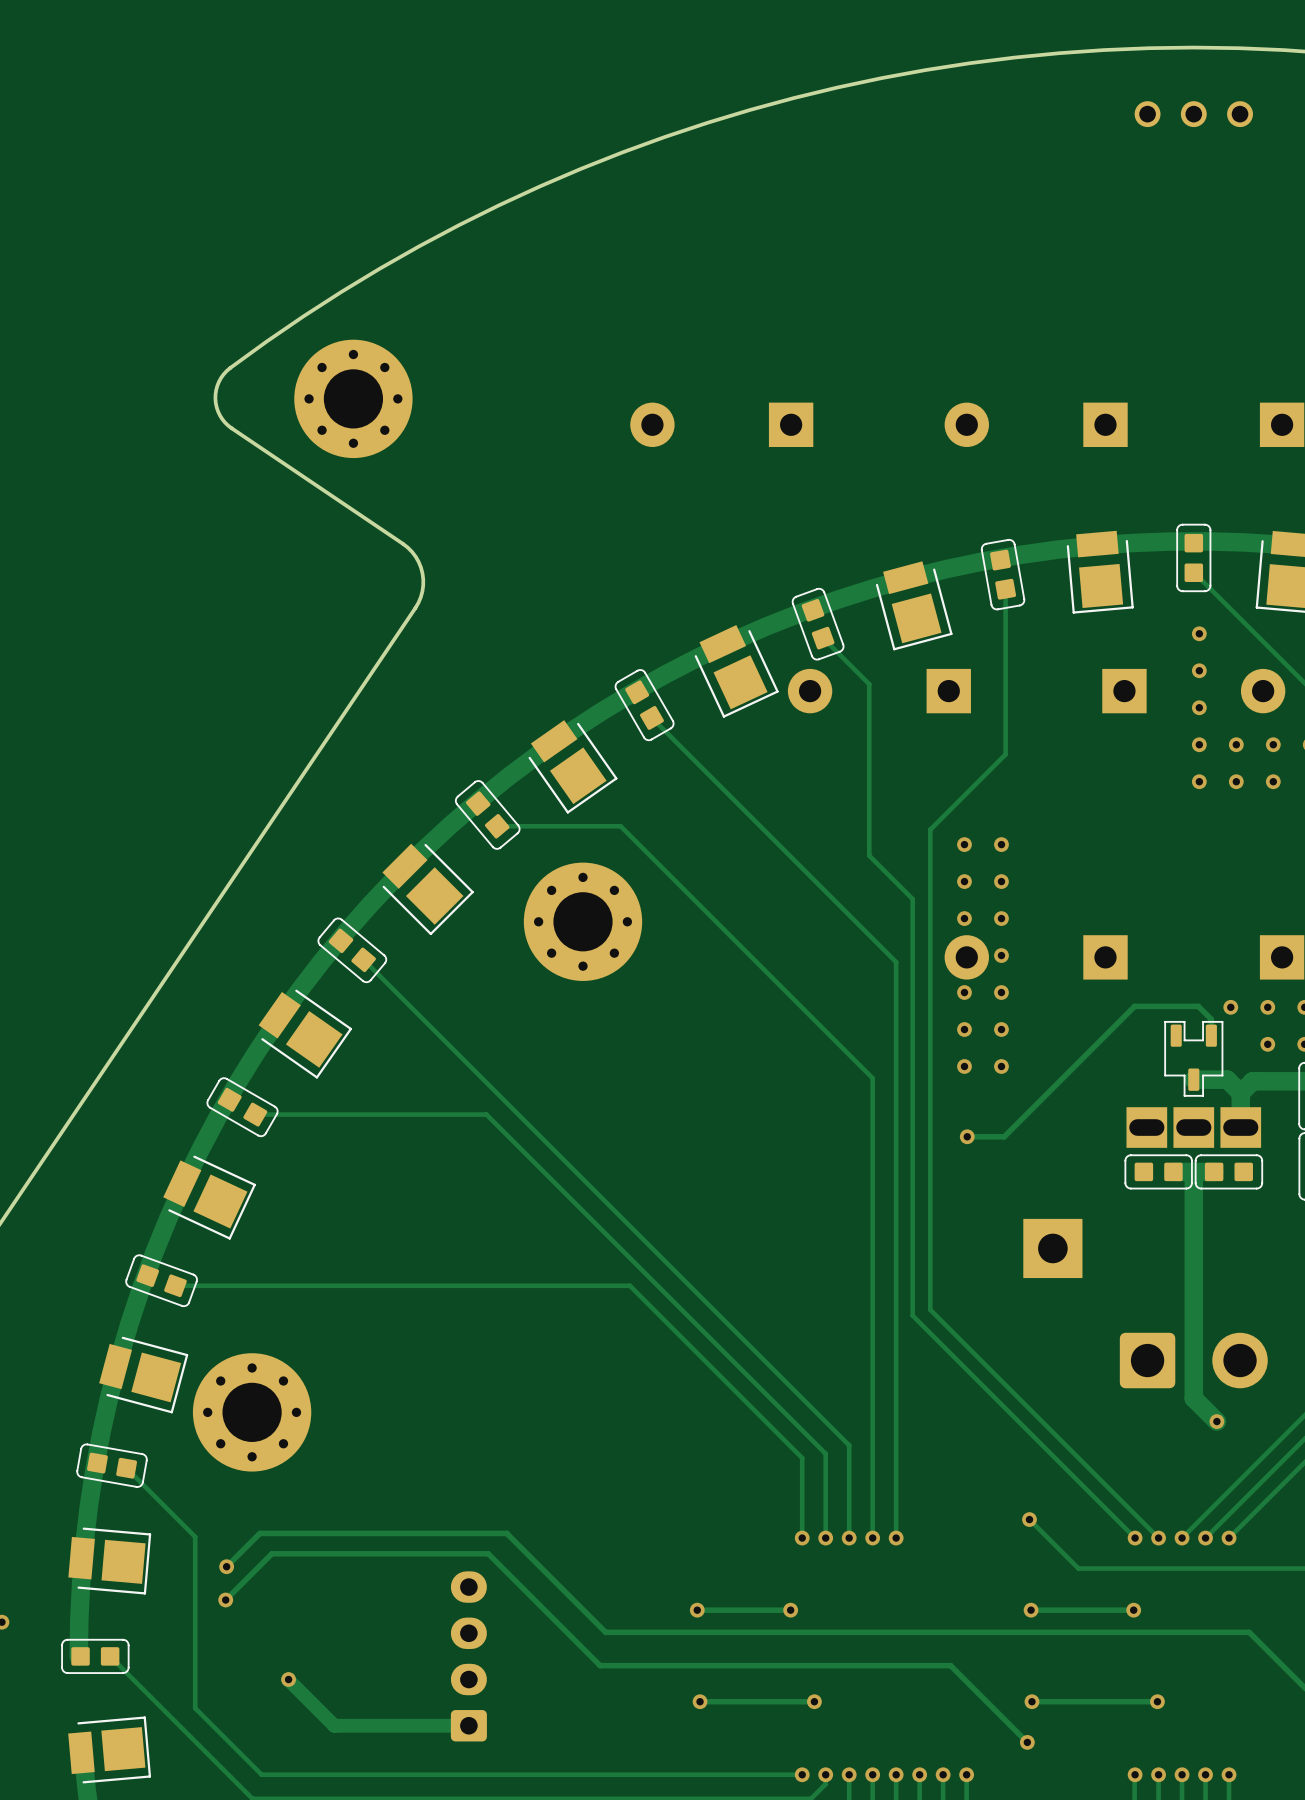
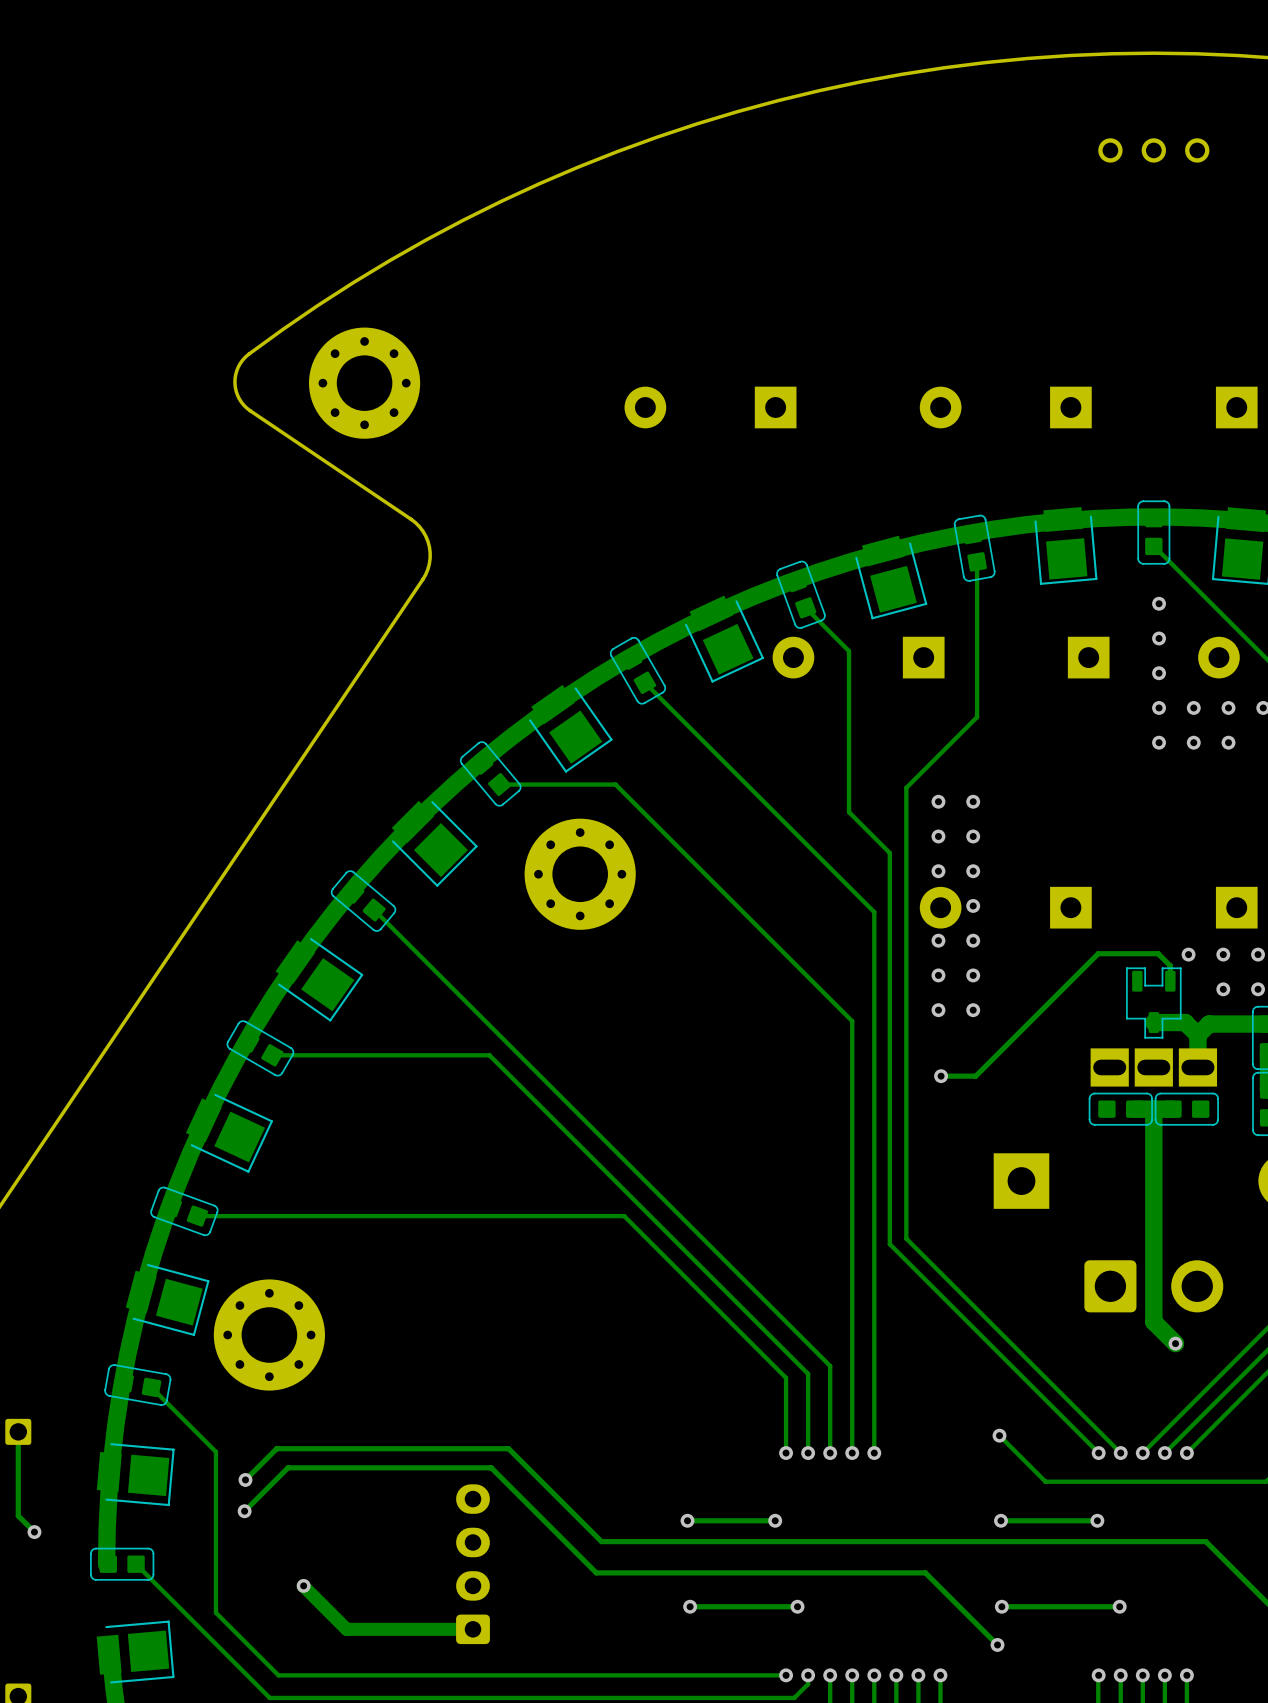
part position: (1193, 114) -> (1153, 150)

